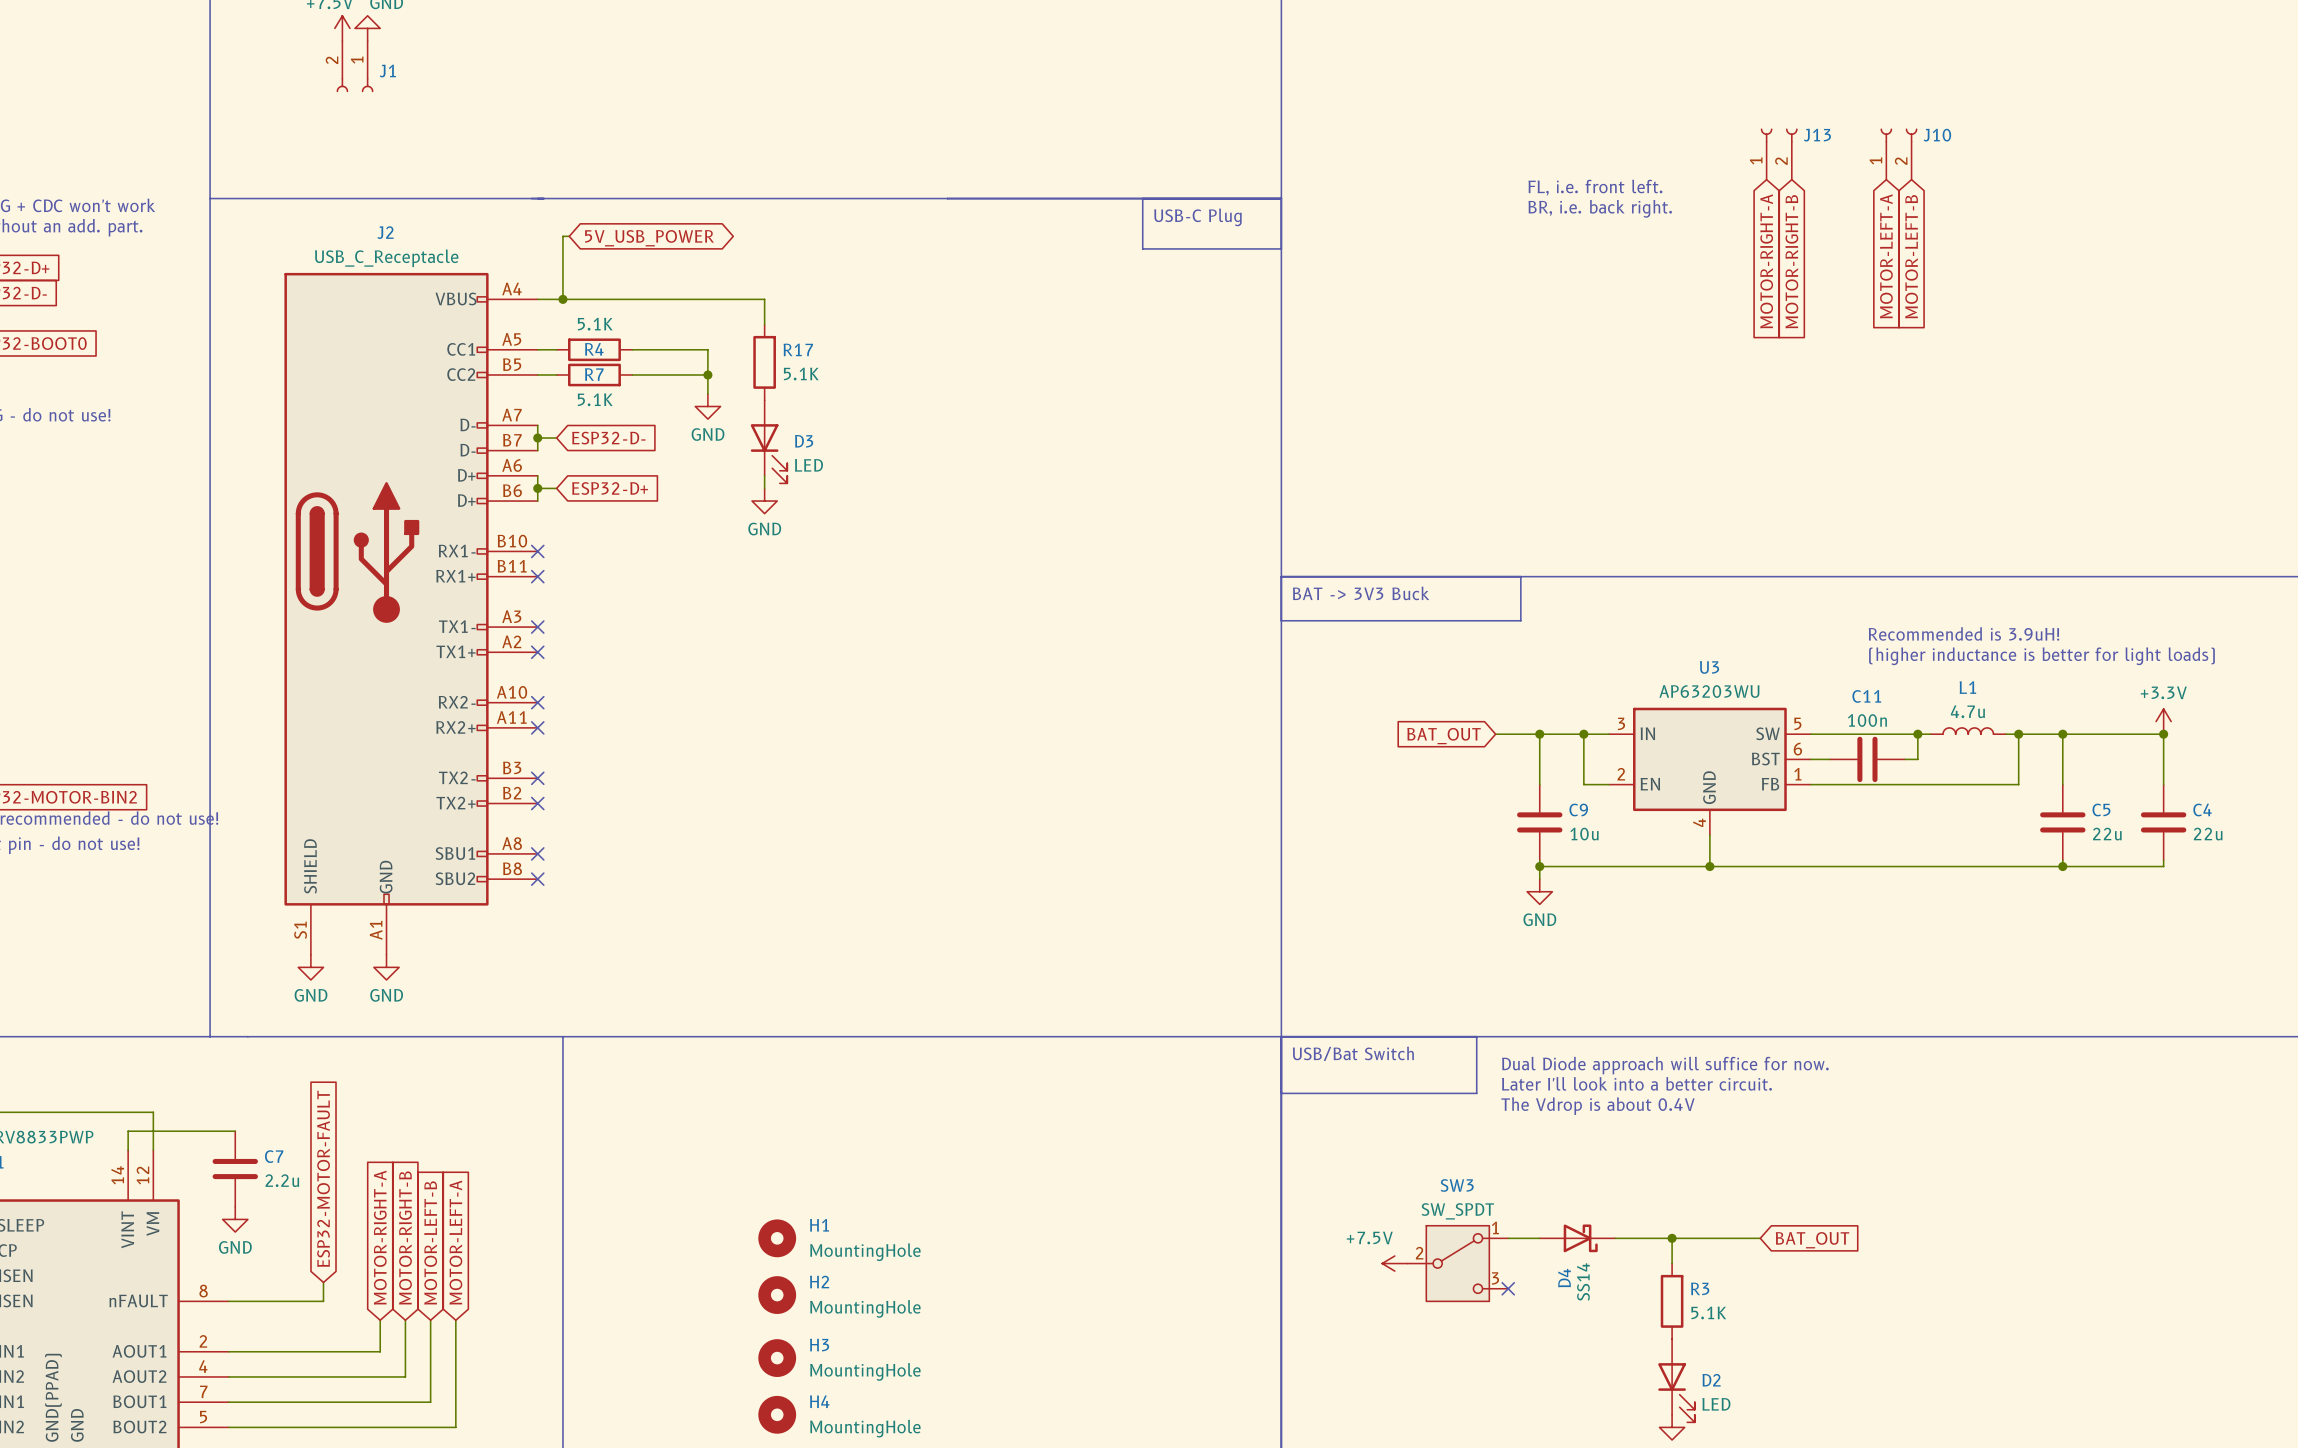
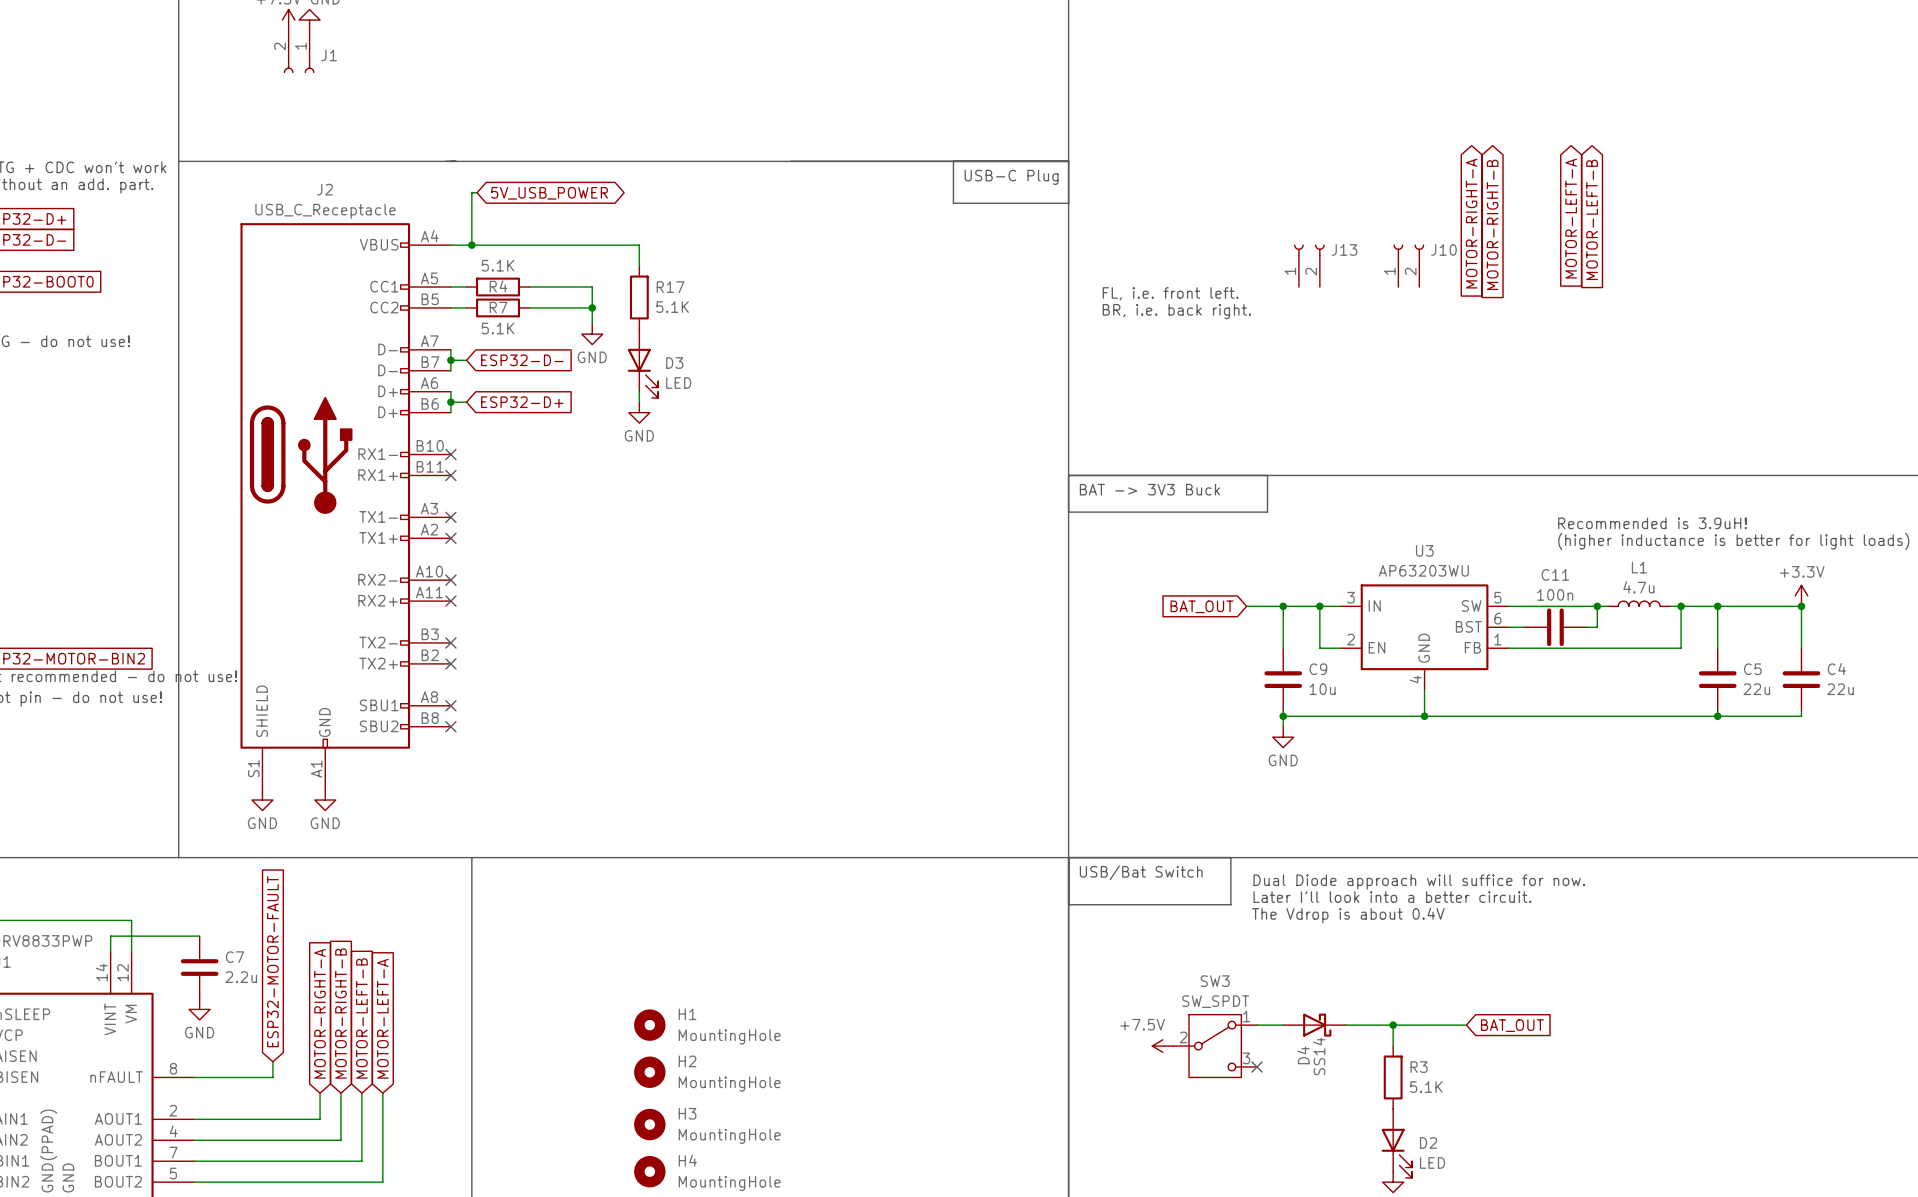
J13 position: (1779, 154) -> (1309, 265)
J10 position: (1898, 154) -> (1408, 265)
text: FL, i.e. front left. (1595, 187) -> none
text: BR, i.e. back right. (1600, 208) -> none
text: none -> FL, i.e. front left. (1170, 293)
text: none -> BR, i.e. back right. (1176, 311)

